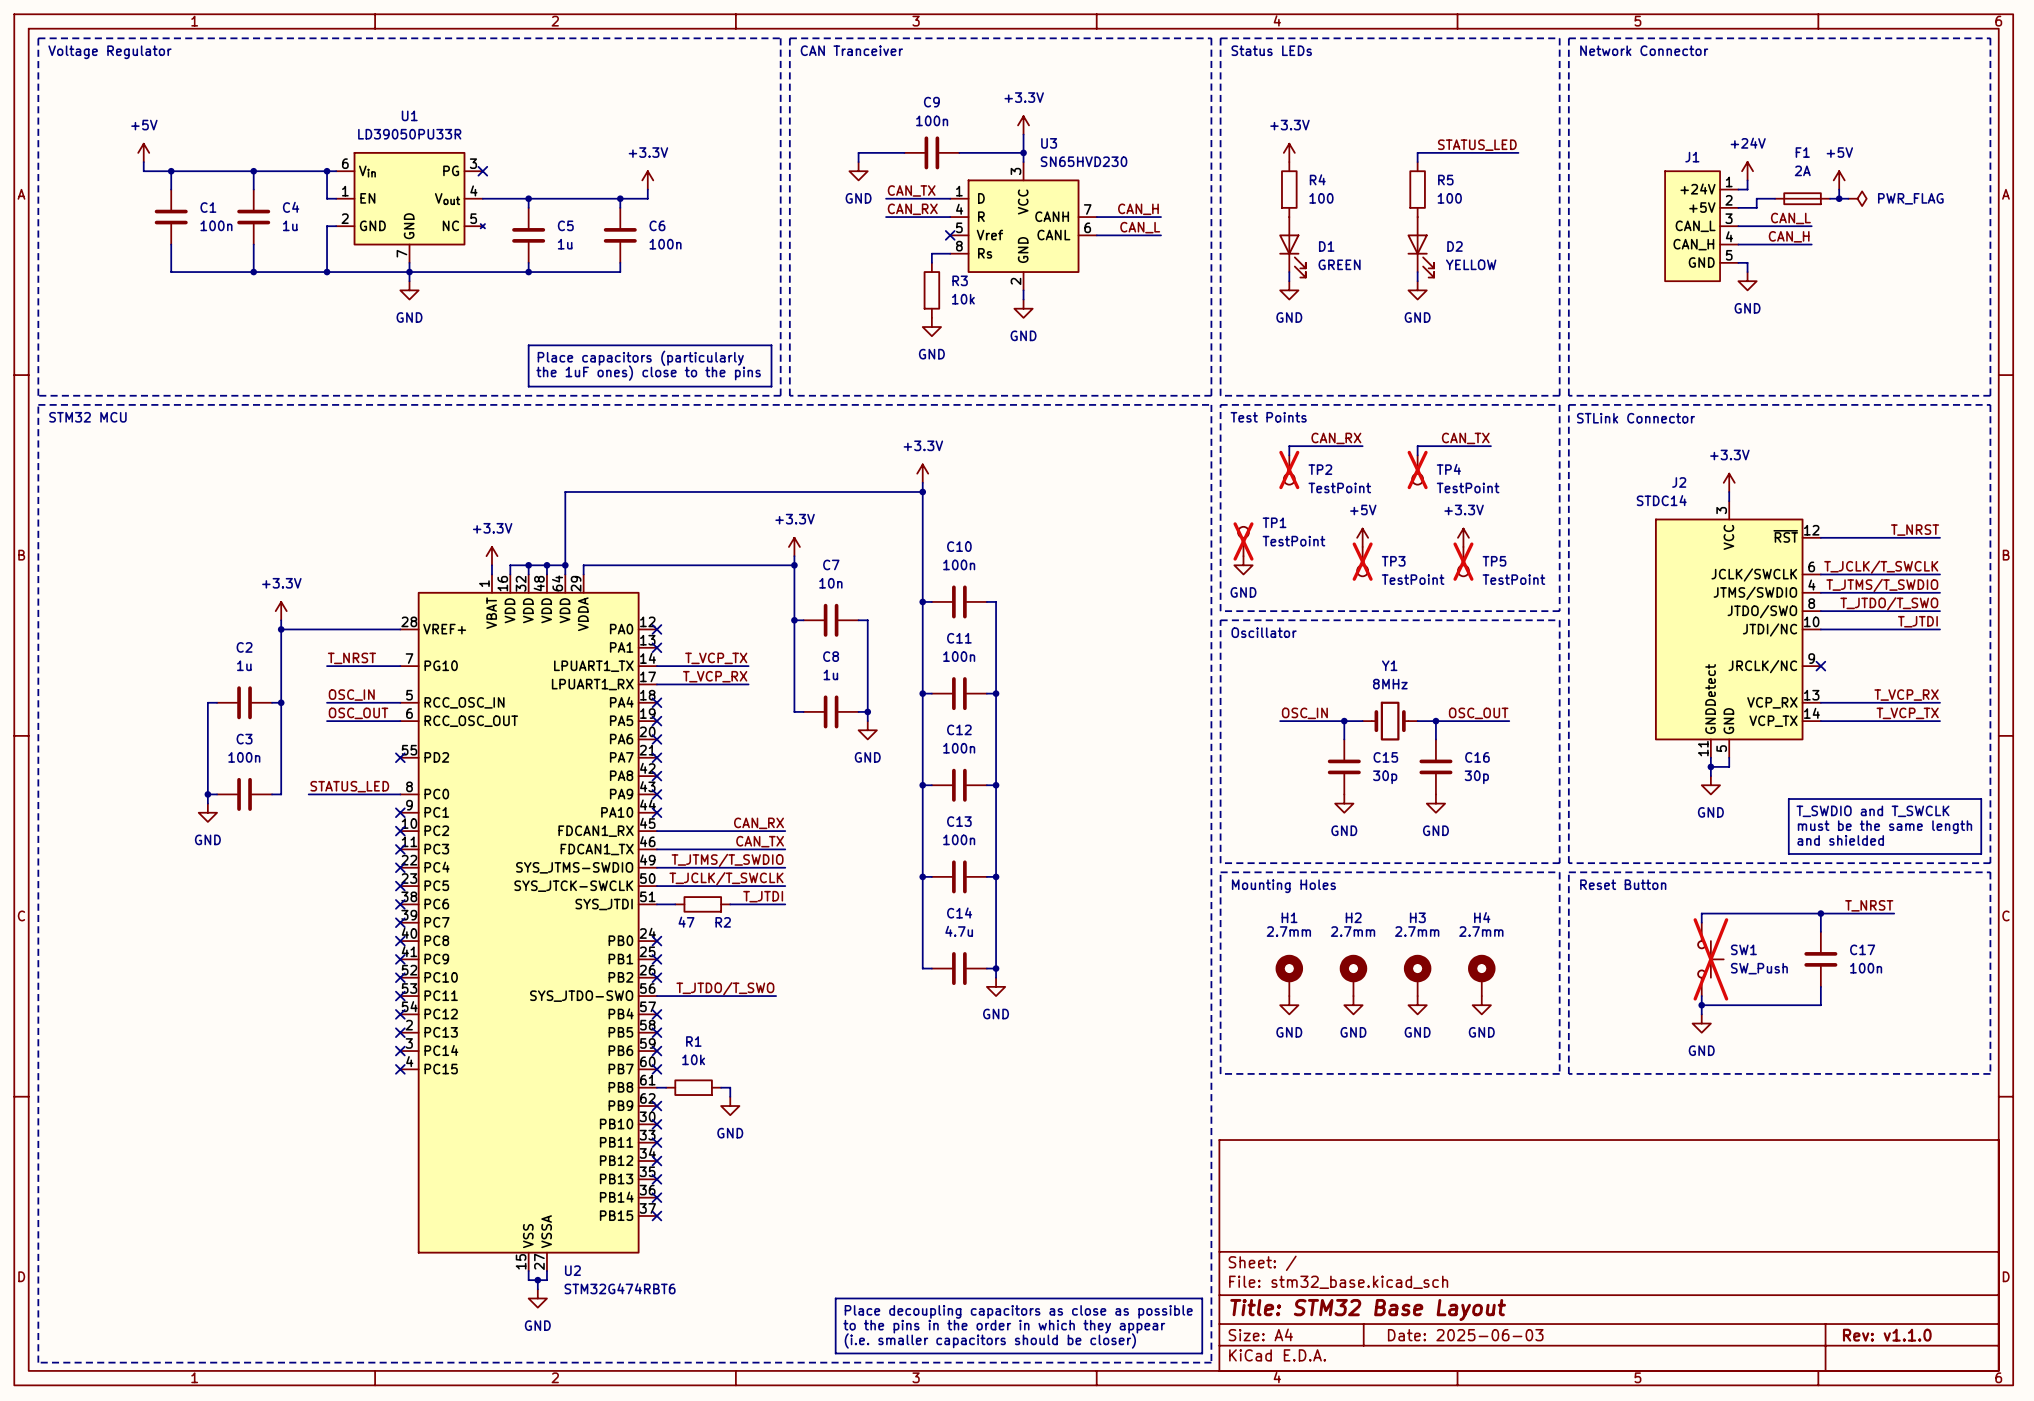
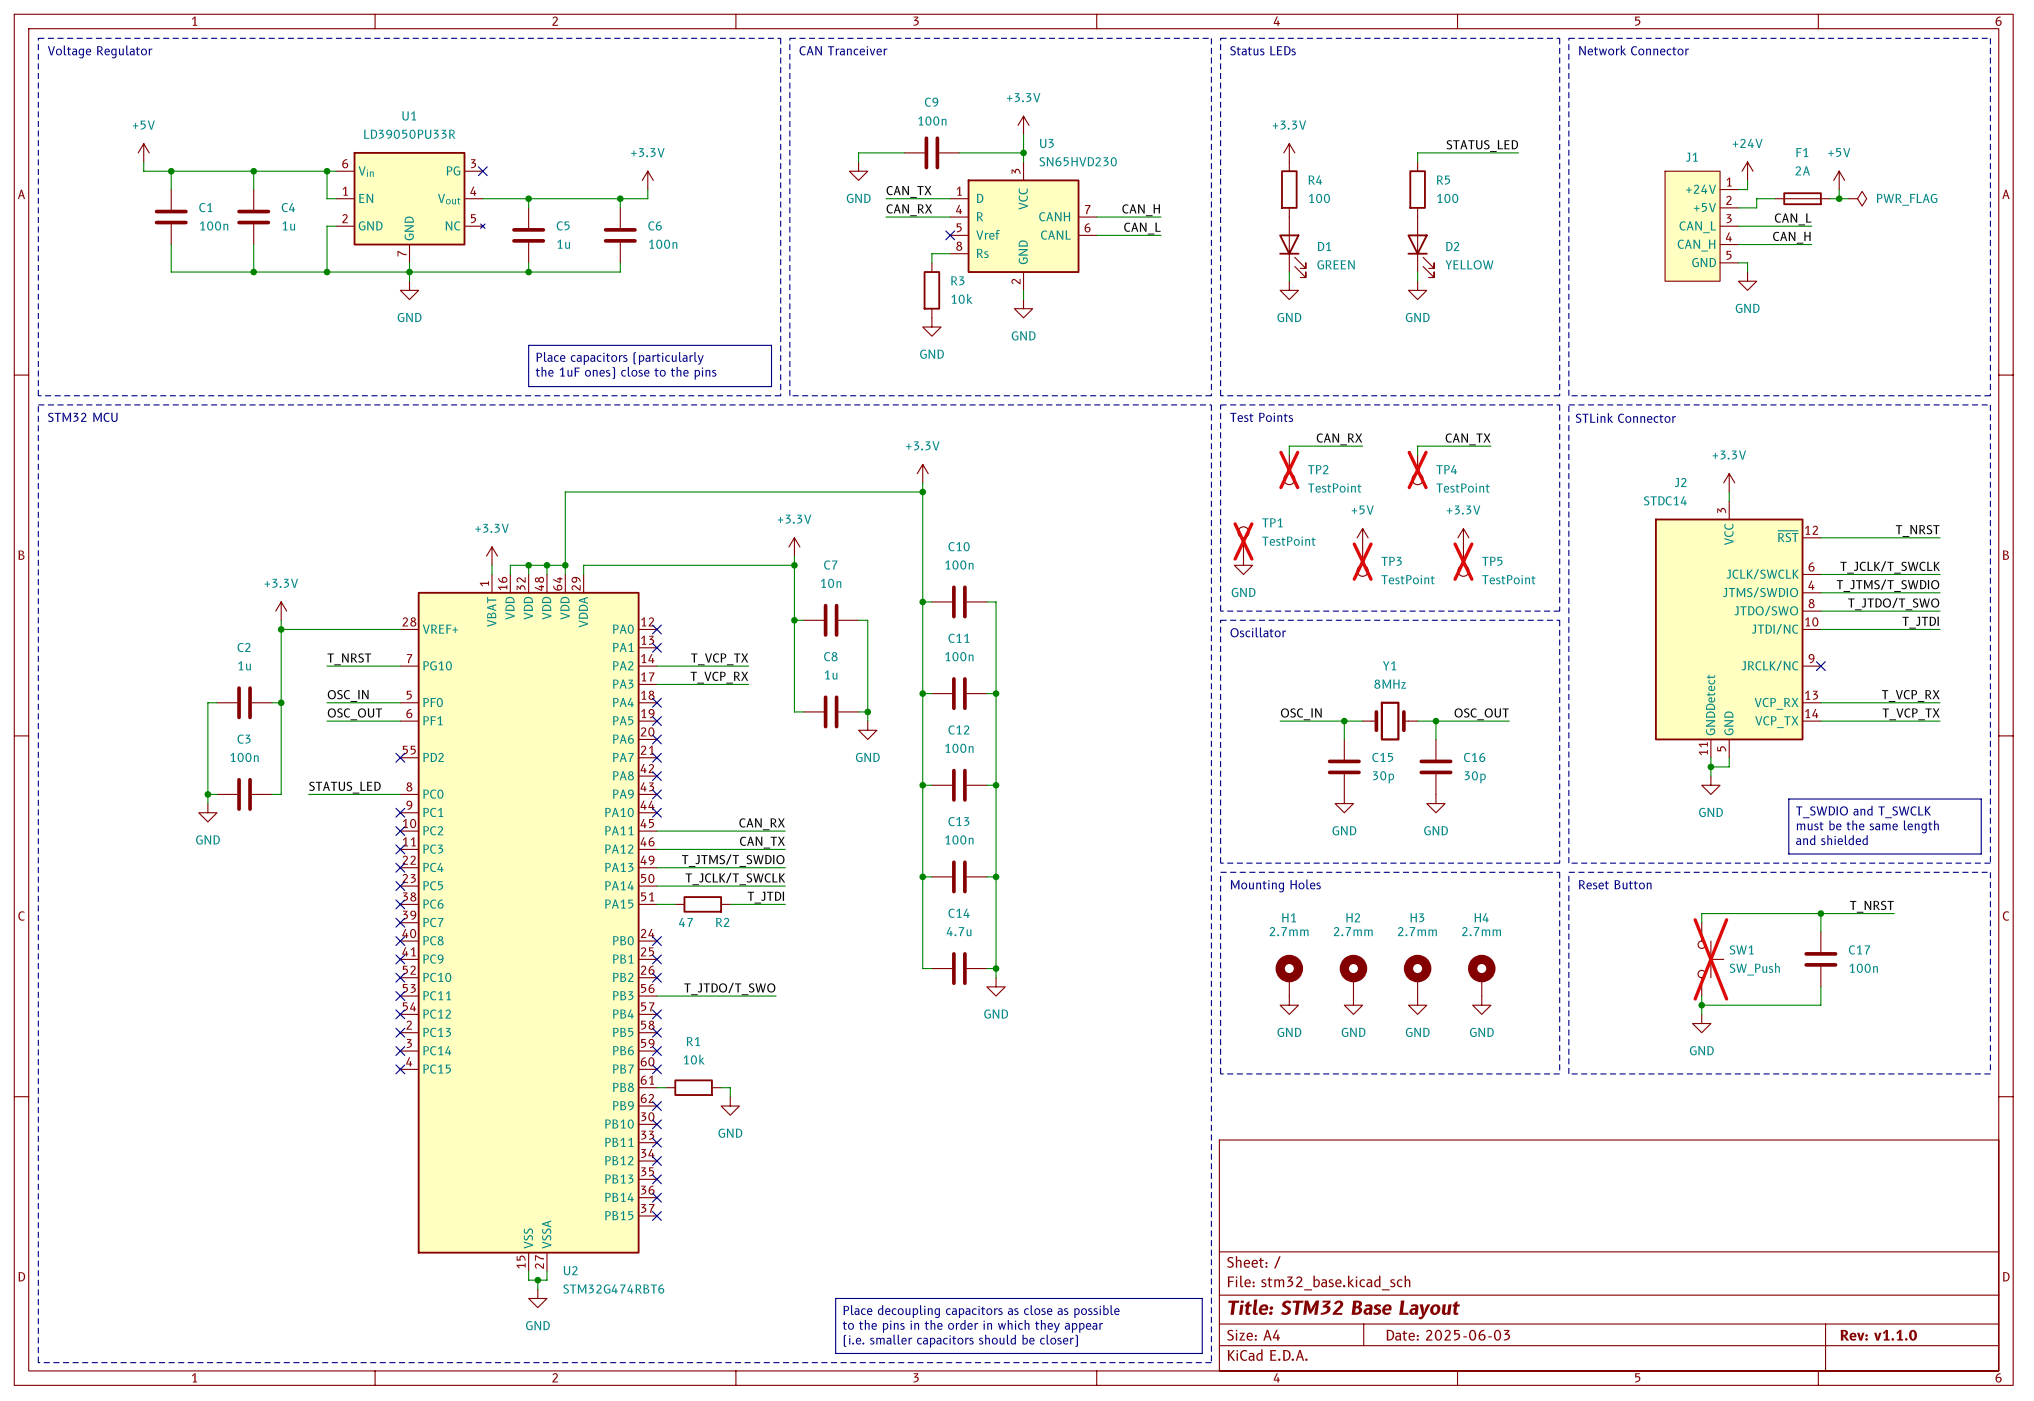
U2 symbol: [400, 574, 657, 1271] -> [400, 574, 657, 1271]

